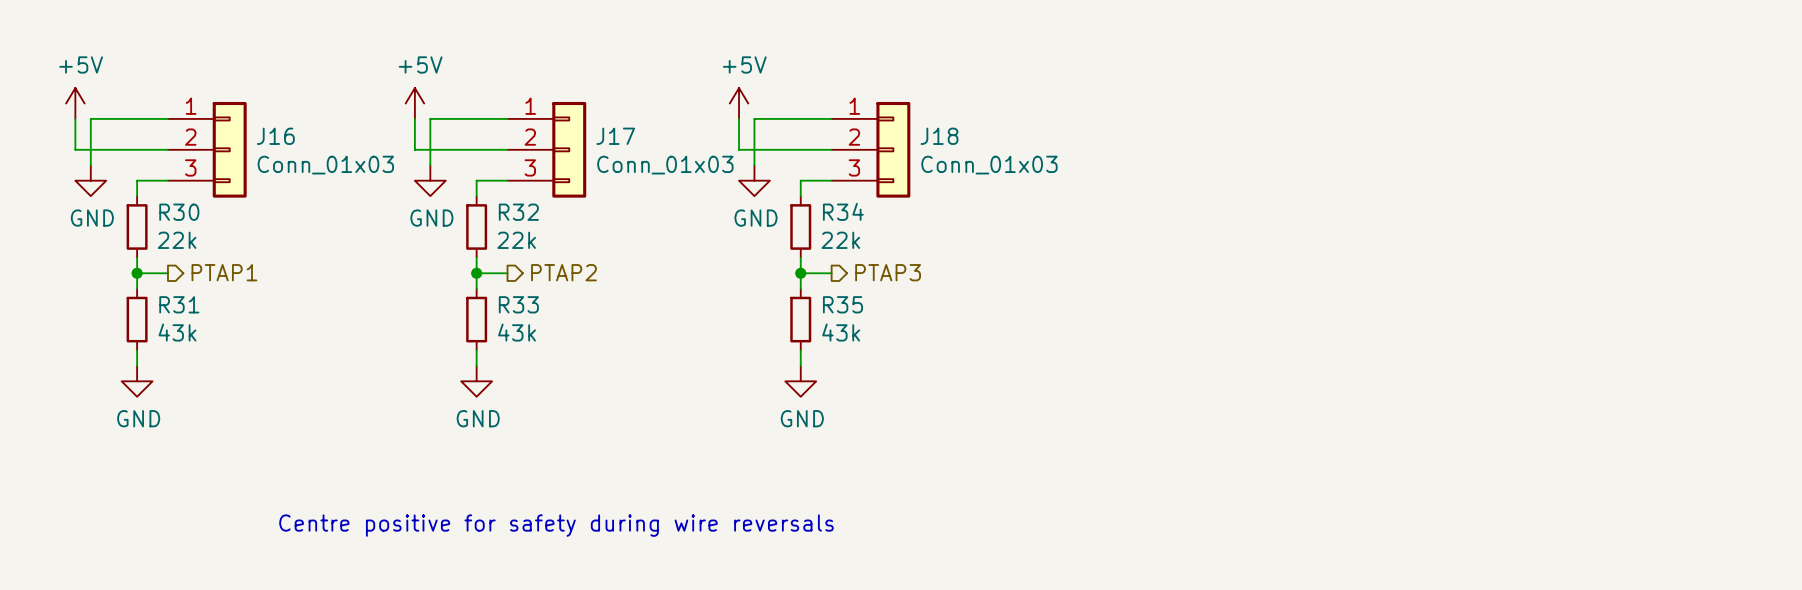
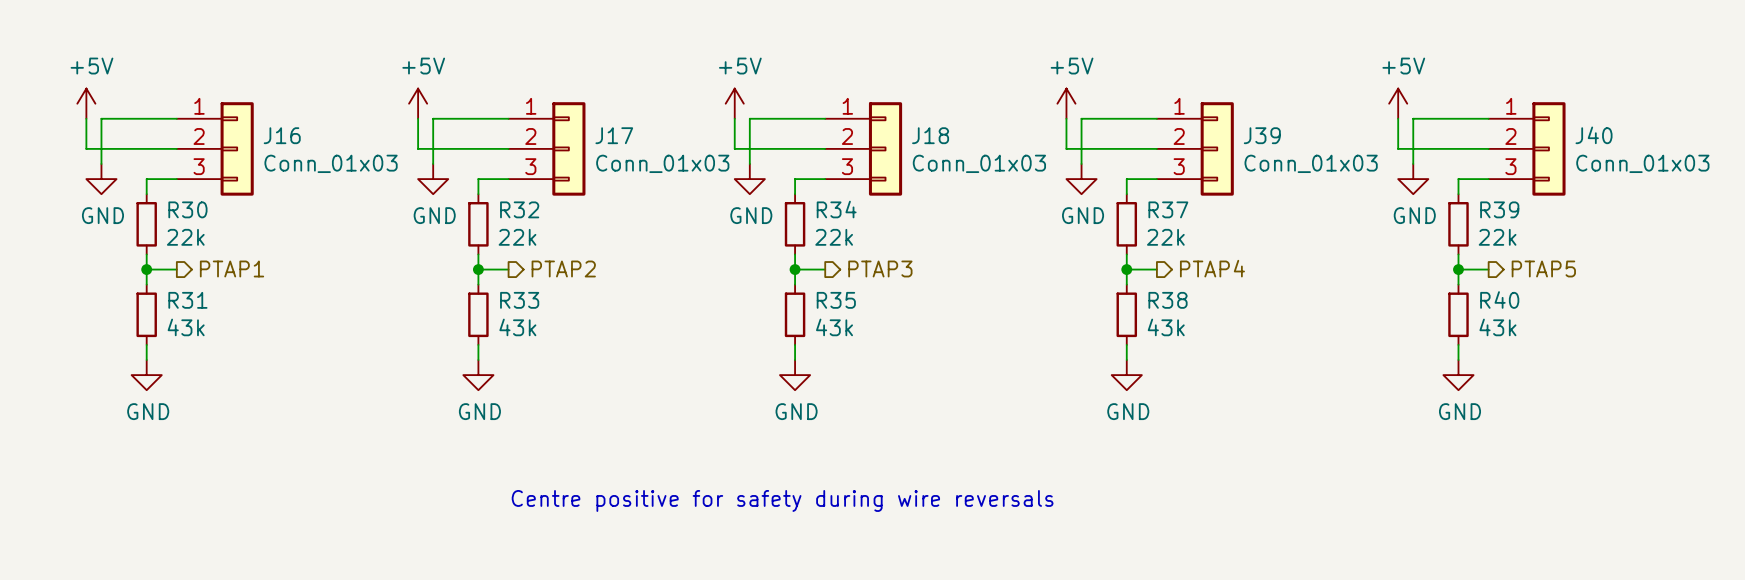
power symbol: none -> +5V (1066, 103)
power symbol: none -> +5V (1398, 103)
wire: none -> (1066, 118) (1066, 148) (1156, 148)
wire: none -> (1156, 118) (1081, 118) (1081, 164)
wire: none -> (1398, 118) (1398, 148) (1488, 148)
wire: none -> (1488, 118) (1413, 118) (1413, 164)
J39: none -> Conn_01x03 (1195, 148)
J40: none -> Conn_01x03 (1527, 148)
power symbol: none -> GND (1081, 179)
wire: none -> (1156, 179) (1126, 179) (1126, 194)
power symbol: none -> GND (1413, 179)
wire: none -> (1488, 179) (1458, 179) (1458, 194)
R37: none -> 22k (1126, 224)
R39: none -> 22k (1458, 224)
wire: none -> (1126, 254) (1126, 284)
wire: none -> (1458, 254) (1458, 284)
hierarchical label: none -> PTAP4 (1212, 268)
hierarchical label: none -> PTAP5 (1543, 268)
wire: none -> (1126, 269) (1156, 269)
junction: none -> (1126, 269)
wire: none -> (1458, 269) (1488, 269)
junction: none -> (1458, 269)
R38: none -> 43k (1126, 314)
R40: none -> 43k (1458, 314)
wire: none -> (1126, 344) (1126, 360)
wire: none -> (1458, 344) (1458, 360)
power symbol: none -> GND (1126, 375)
power symbol: none -> GND (1458, 375)
text position: Centre positive for safety during wire reversals (556, 525) -> Centre positive for safety during wire reversals (782, 500)

